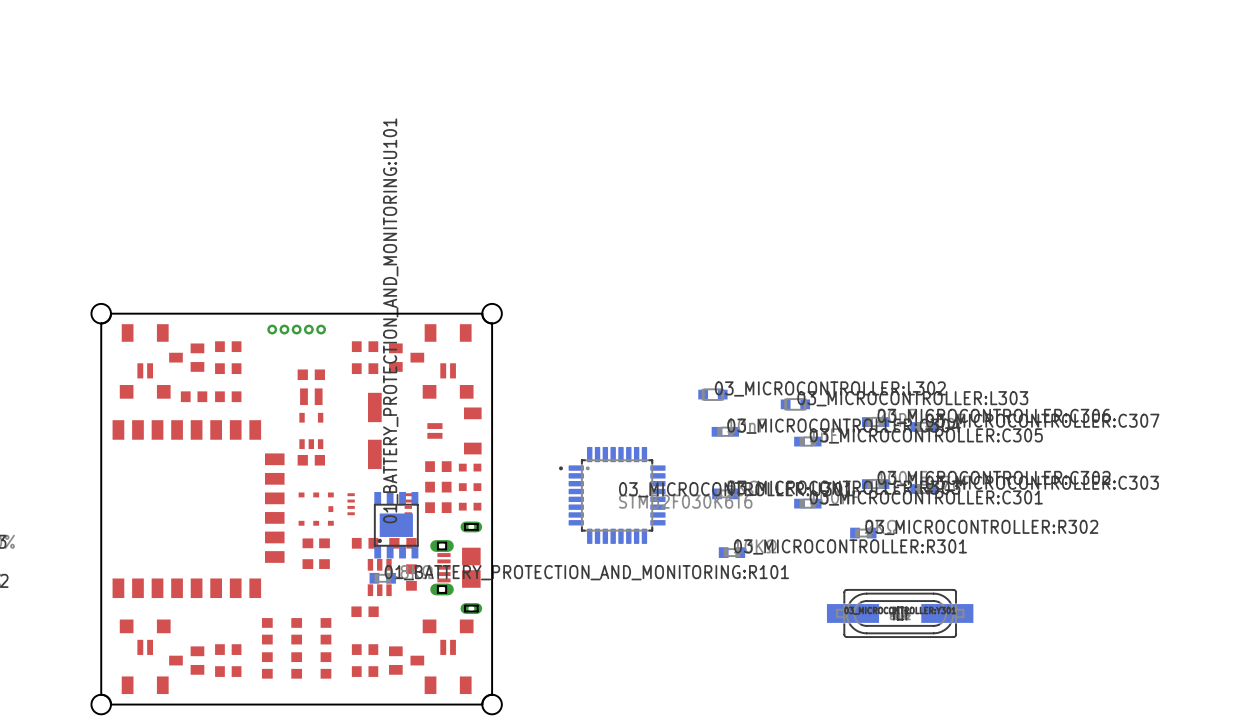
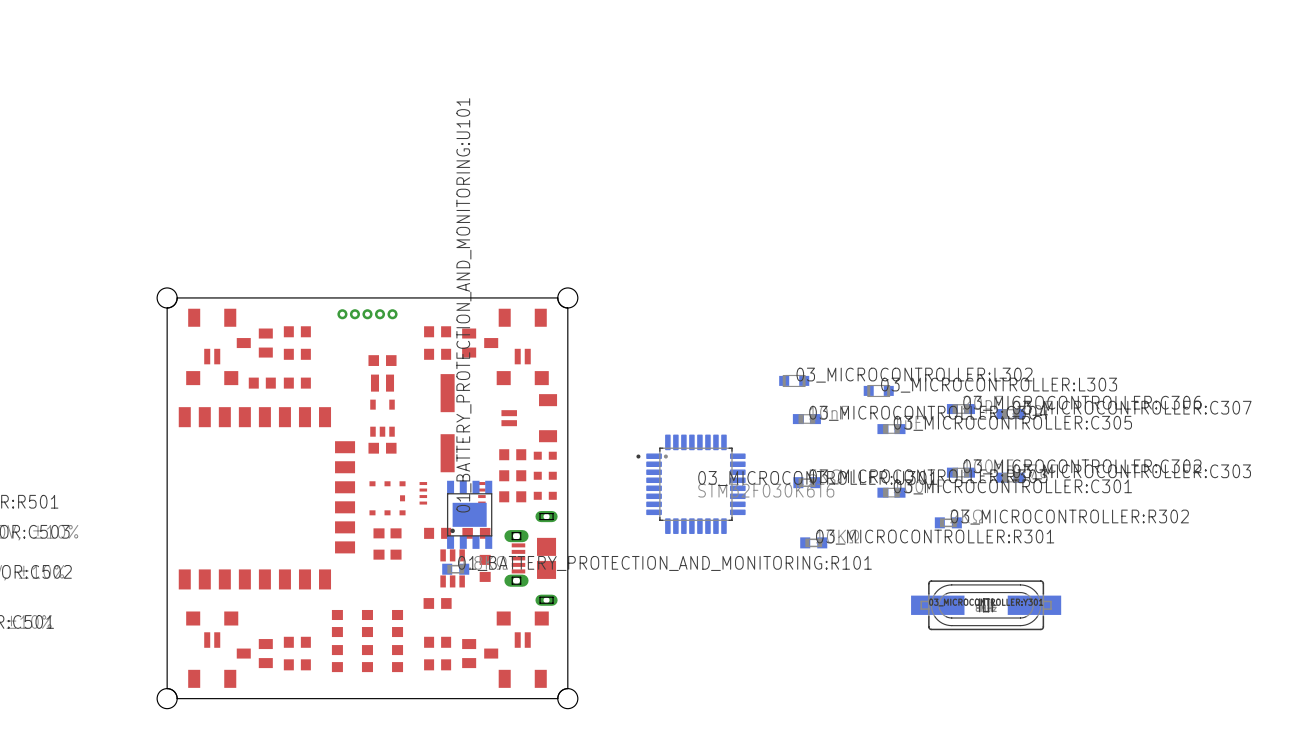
part footprint: [367, 392, 382, 470] -> [440, 374, 455, 473]

